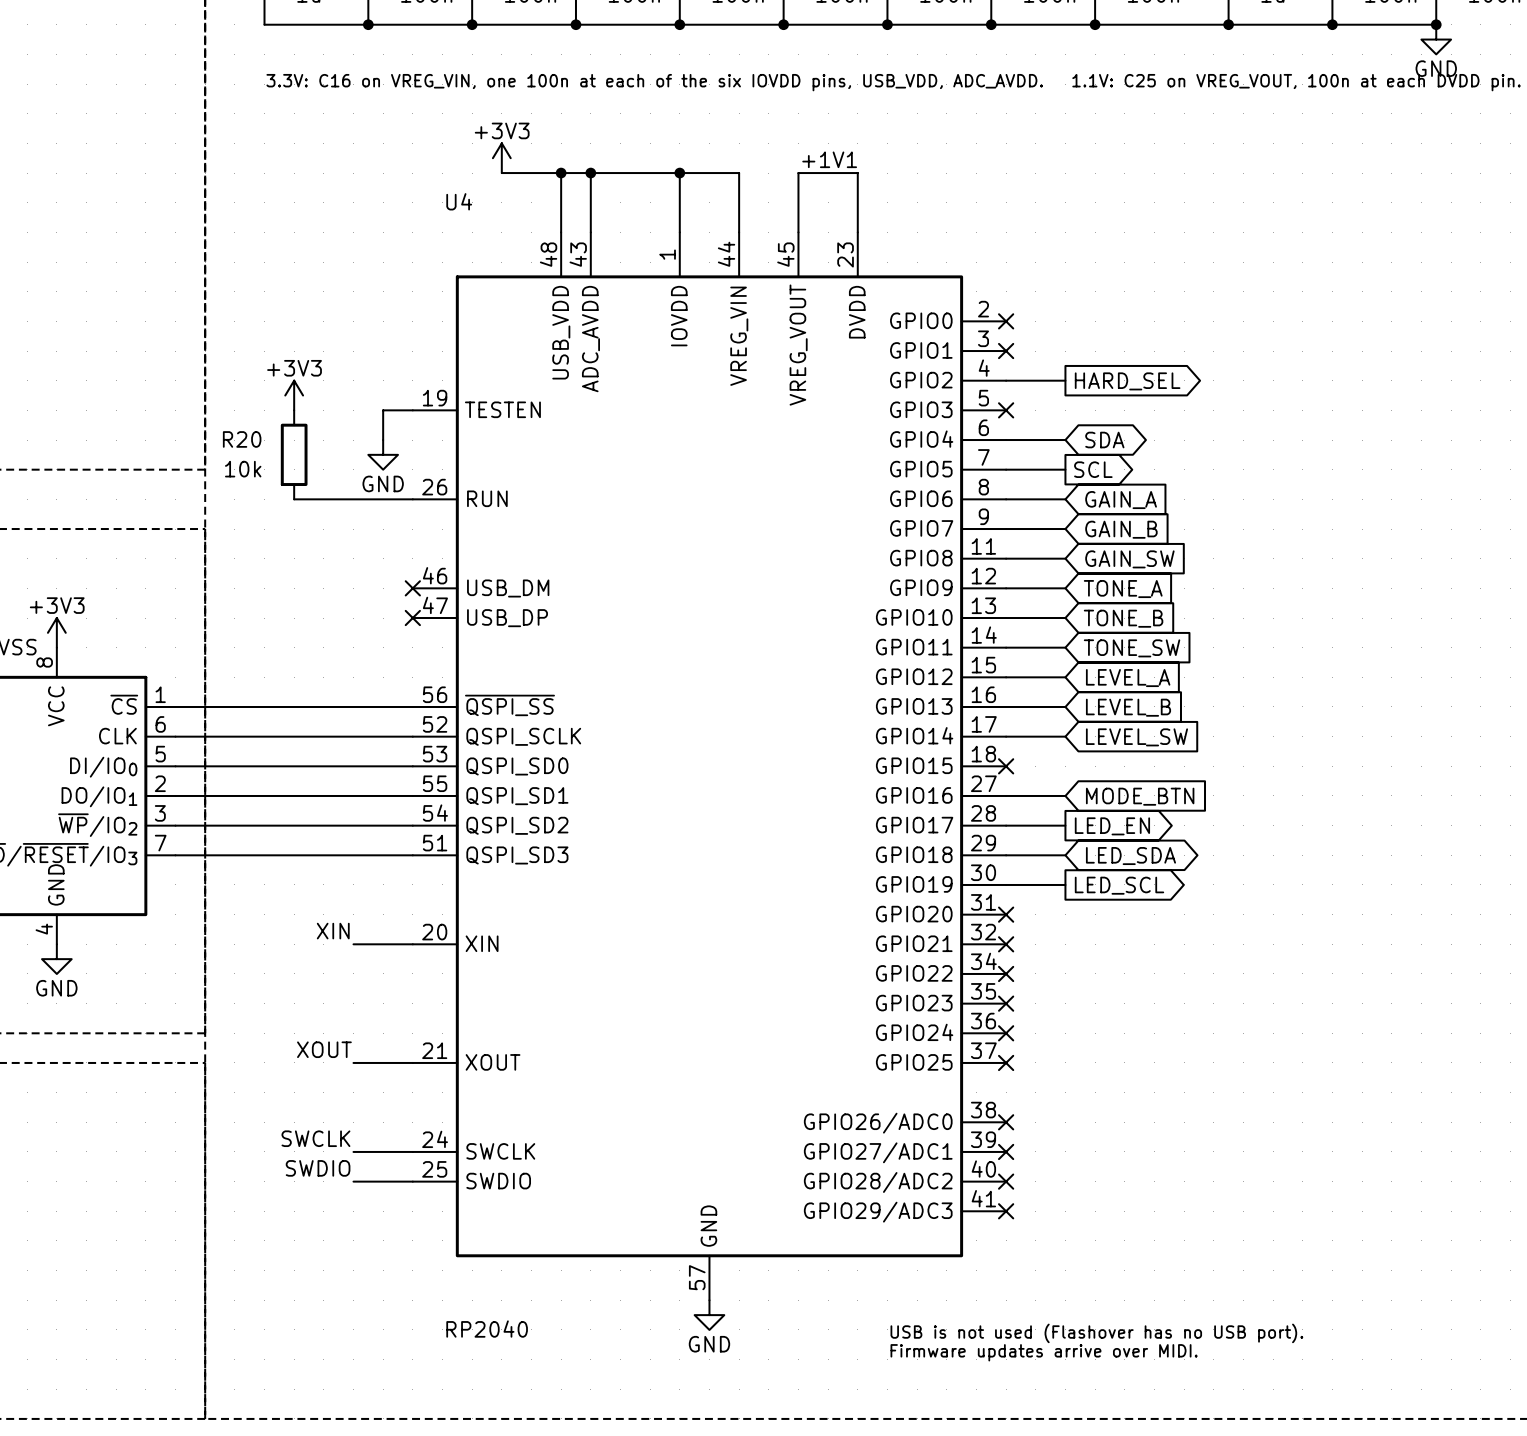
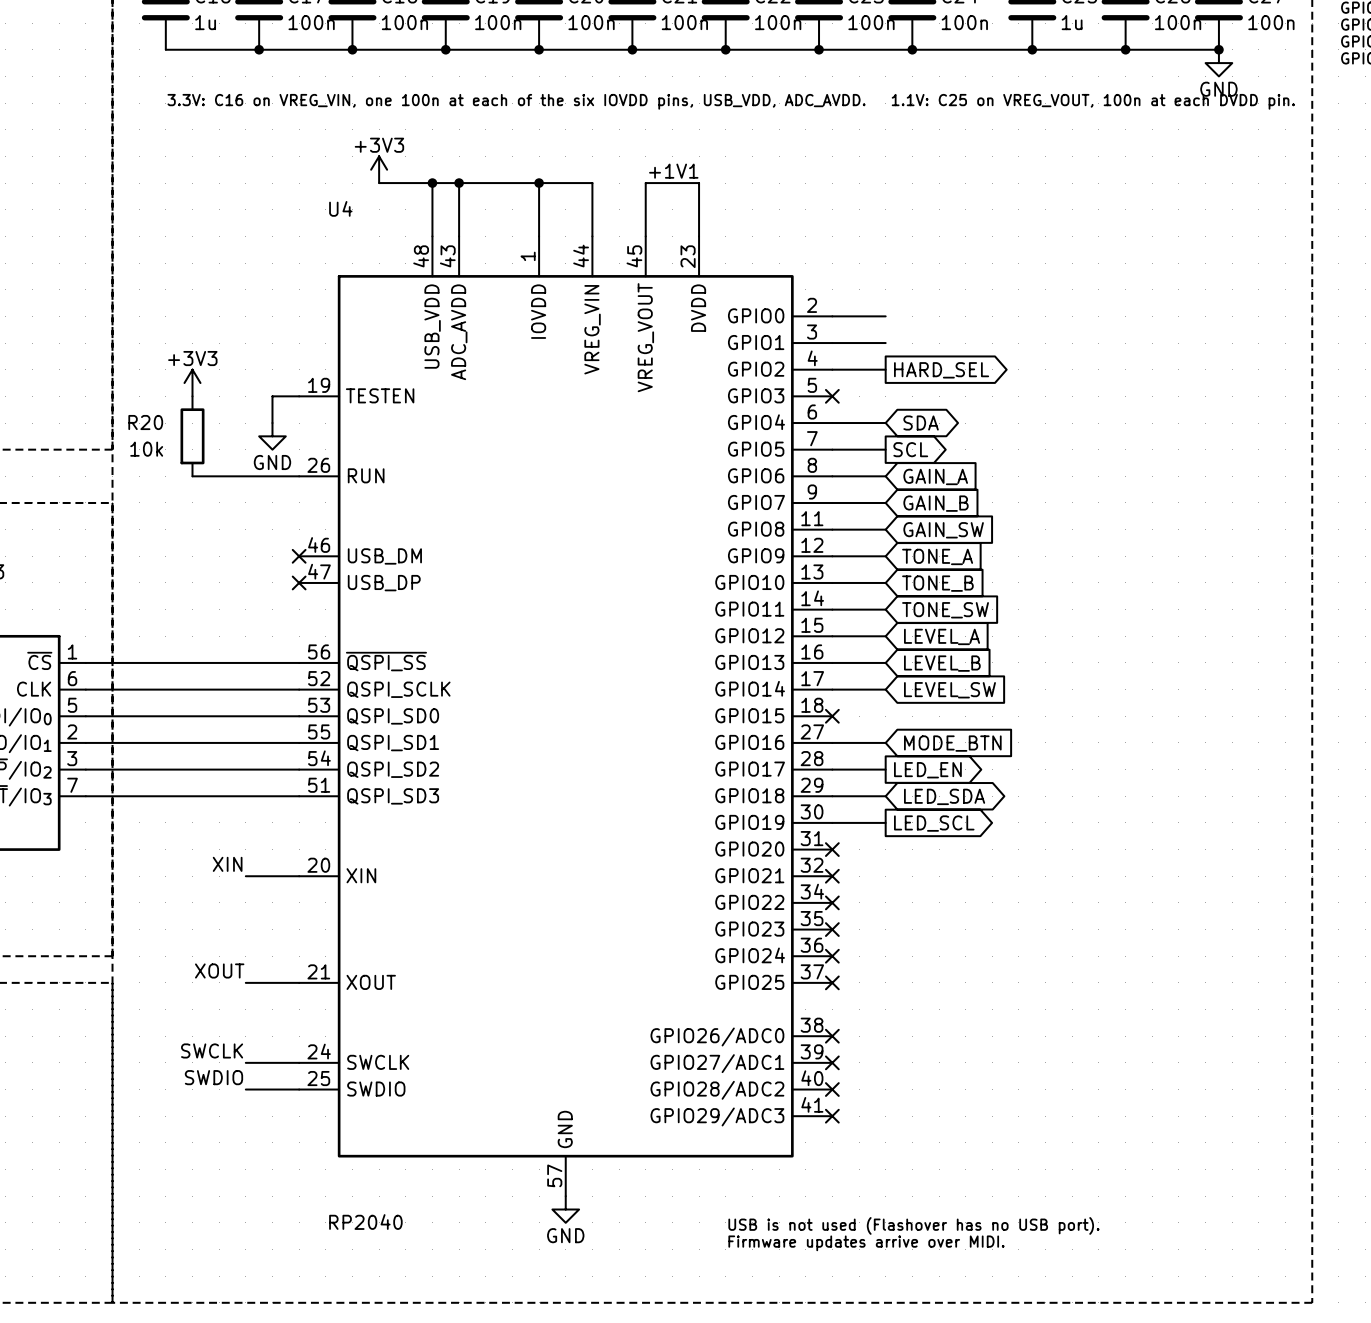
wire: none -> (832, 316) (885, 316)
no-connect mark: (1006, 321) -> none
wire: none -> (832, 343) (885, 343)
no-connect mark: (1006, 351) -> none

